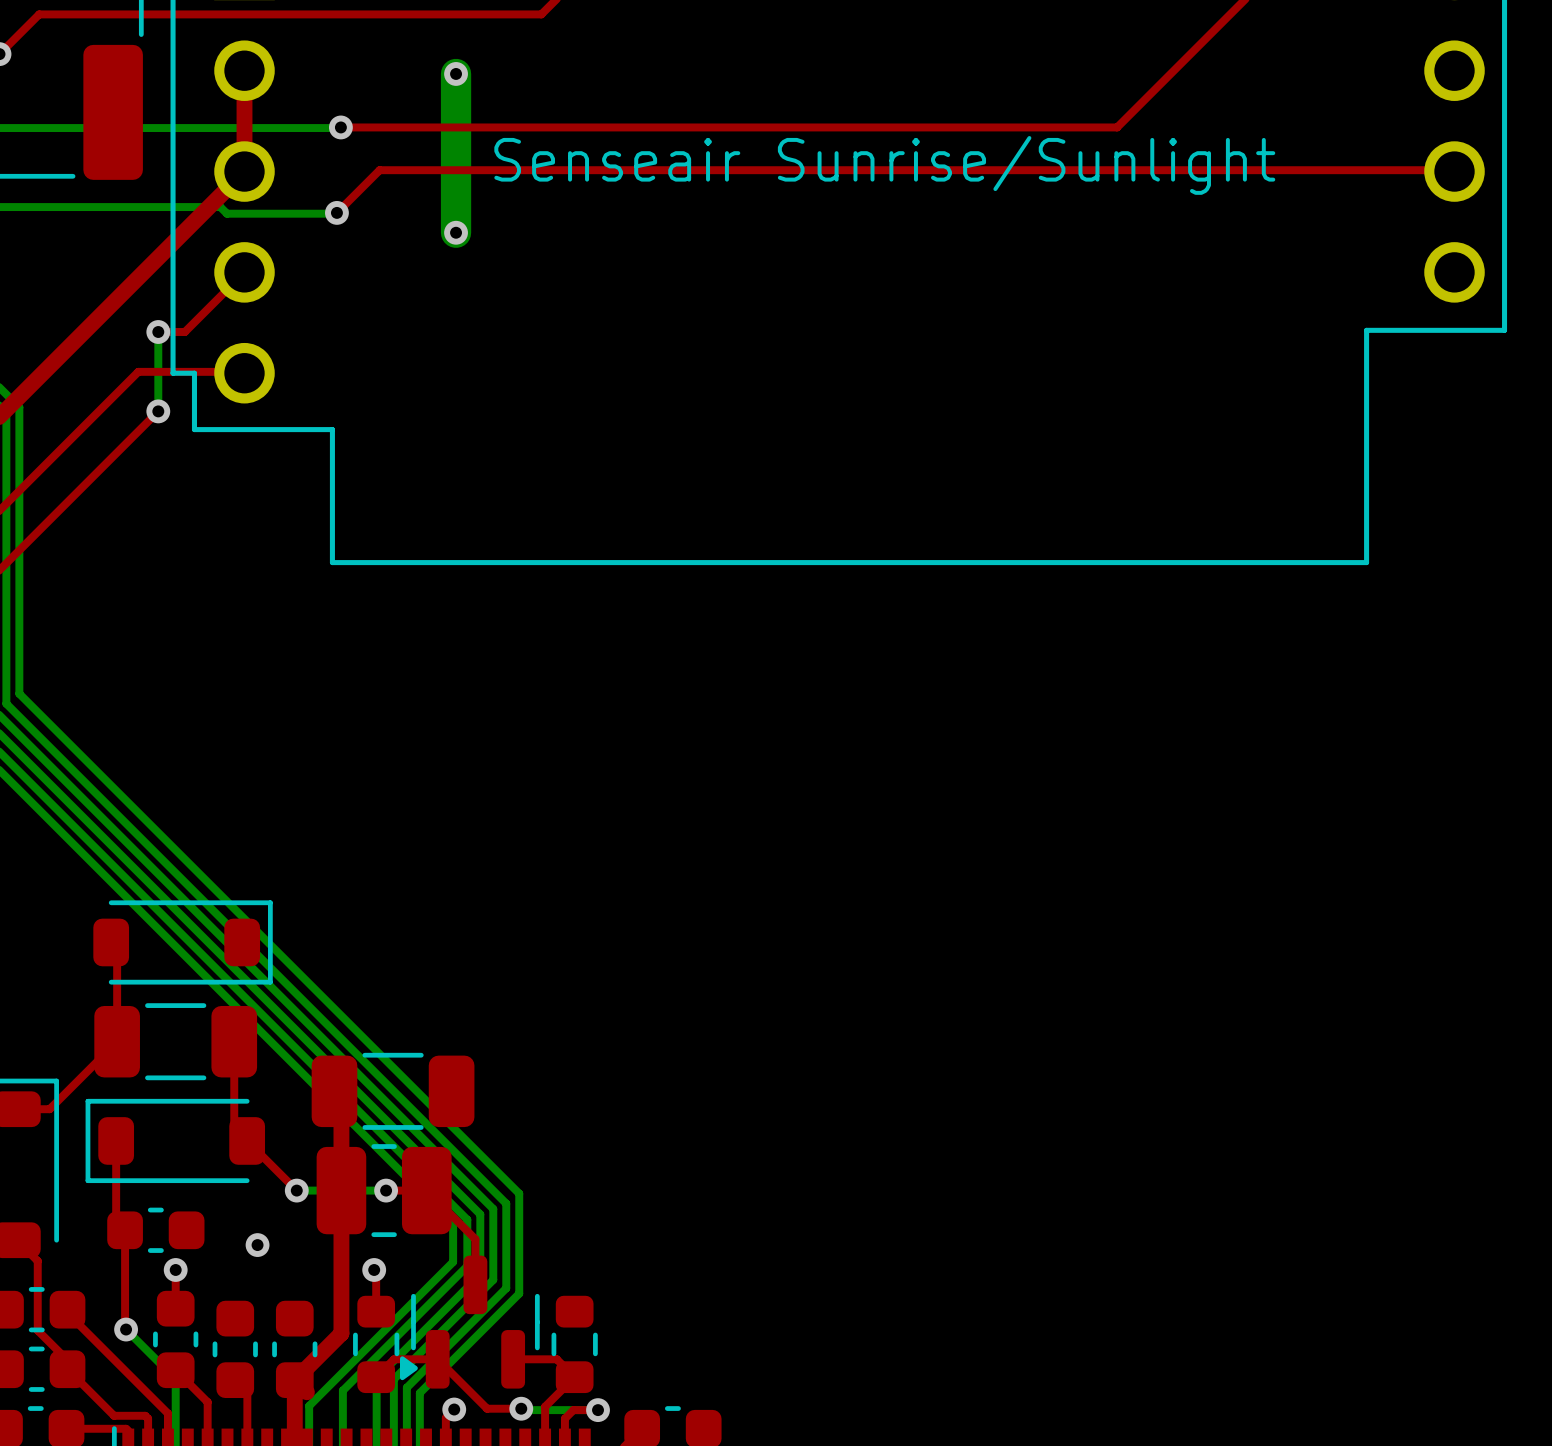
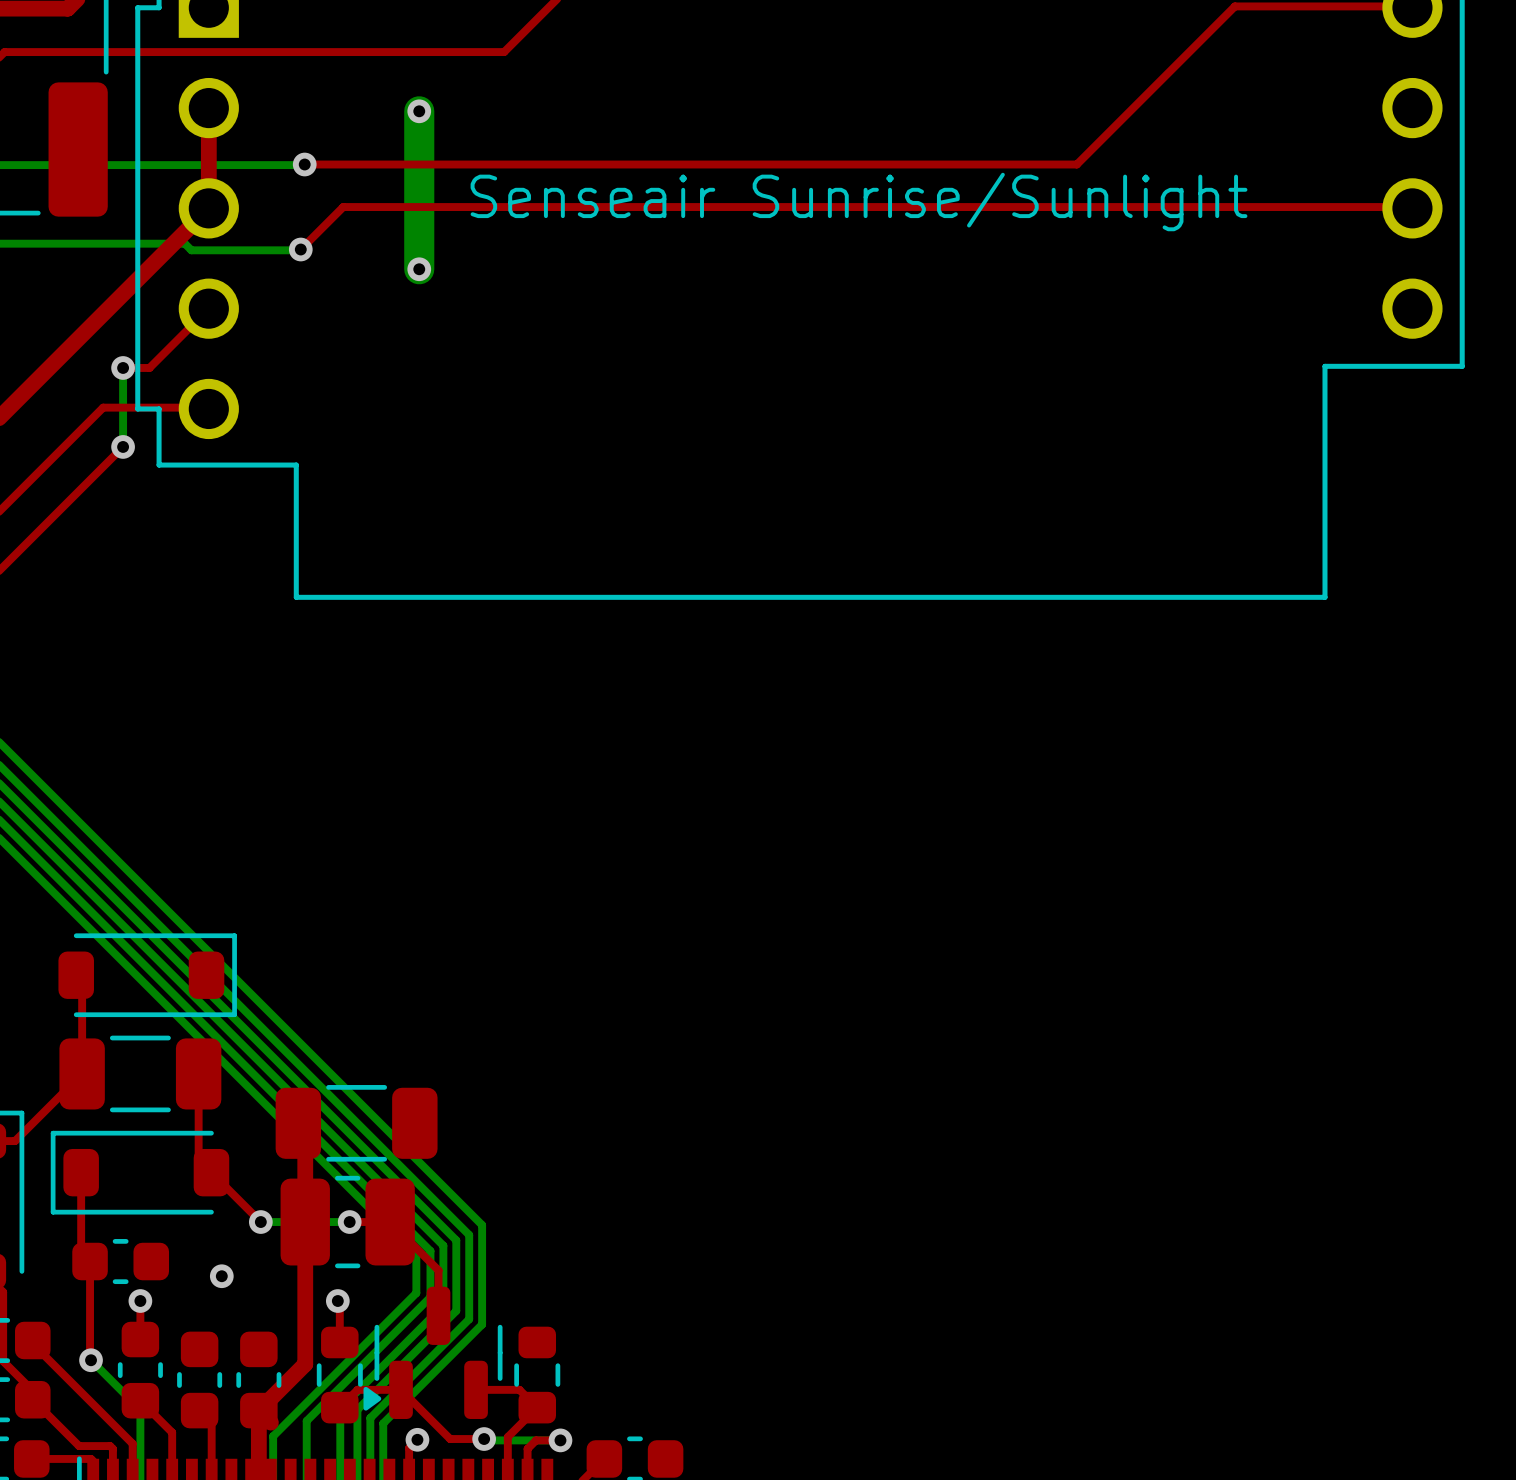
text position: Senseair Sunrise/Sunlight (884, 165) -> Senseair Sunrise/Sunlight (859, 202)

